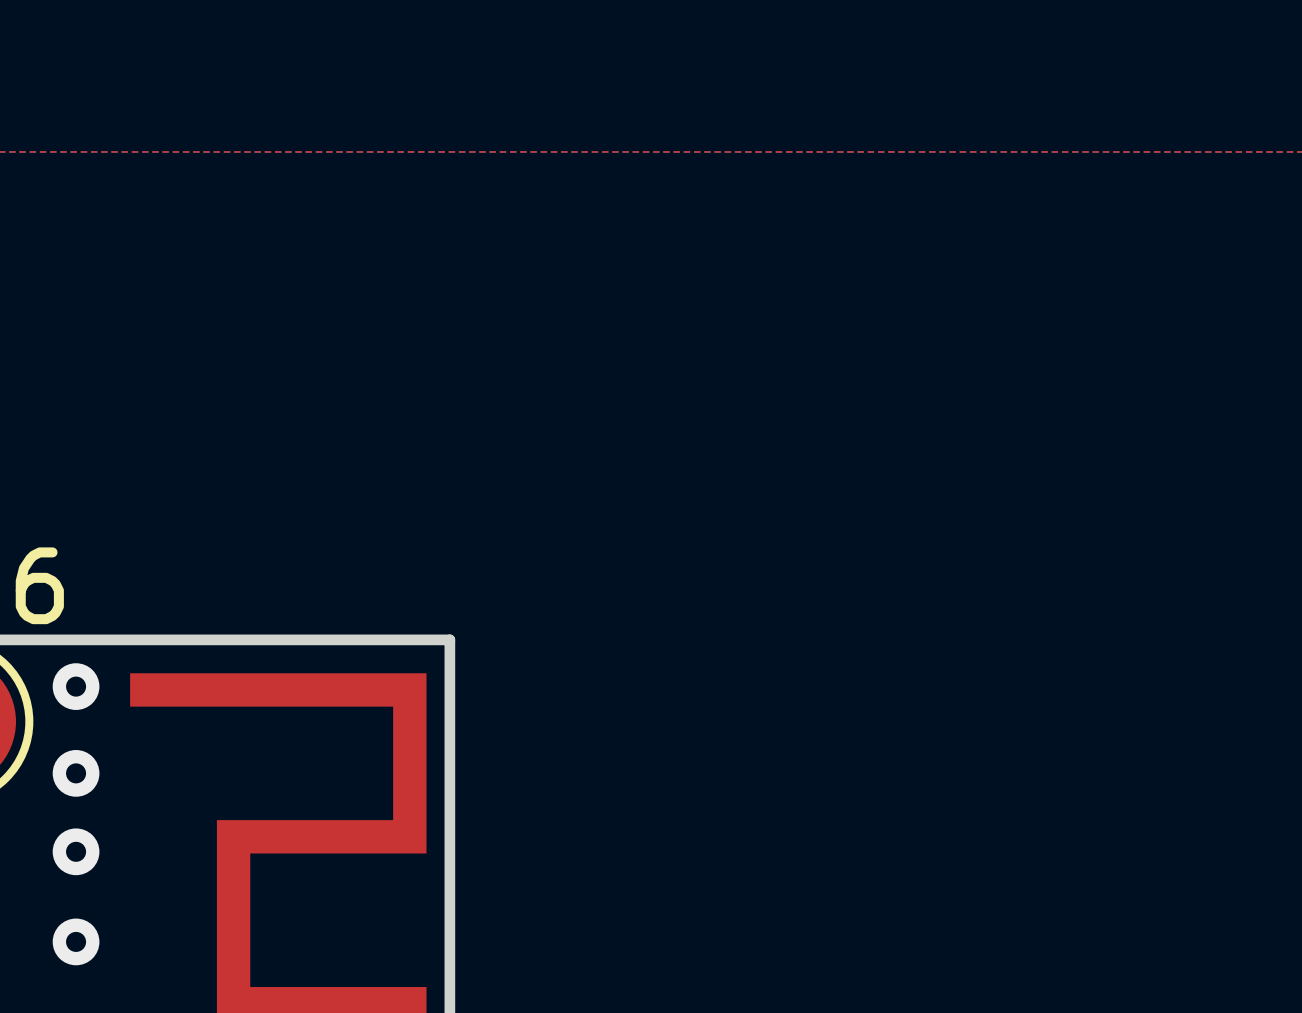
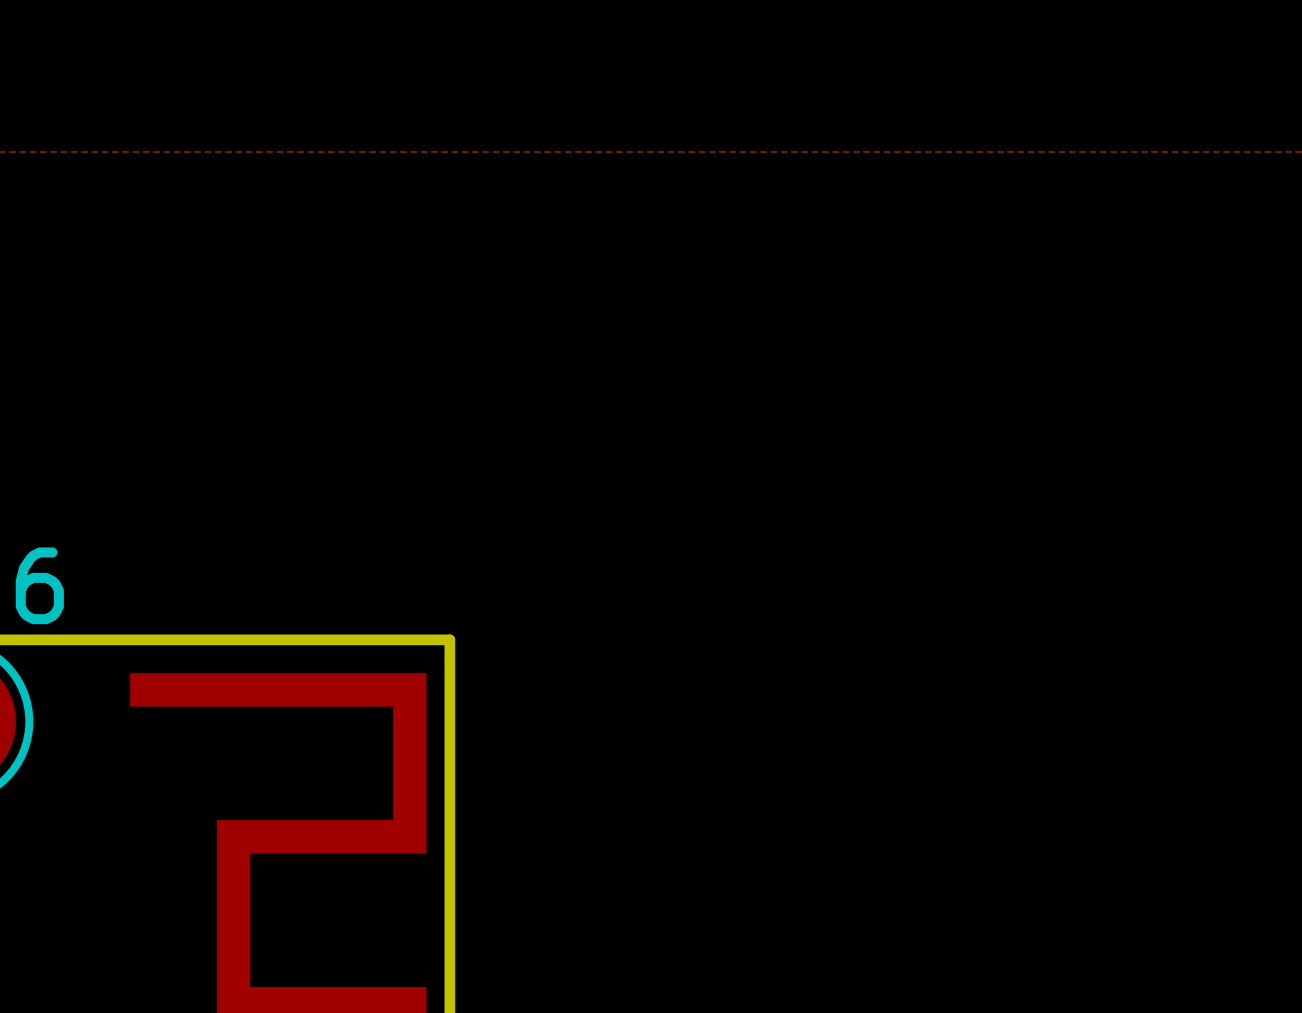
via: (76, 686) -> none
via: (76, 773) -> none
via: (76, 851) -> none
via: (76, 941) -> none

